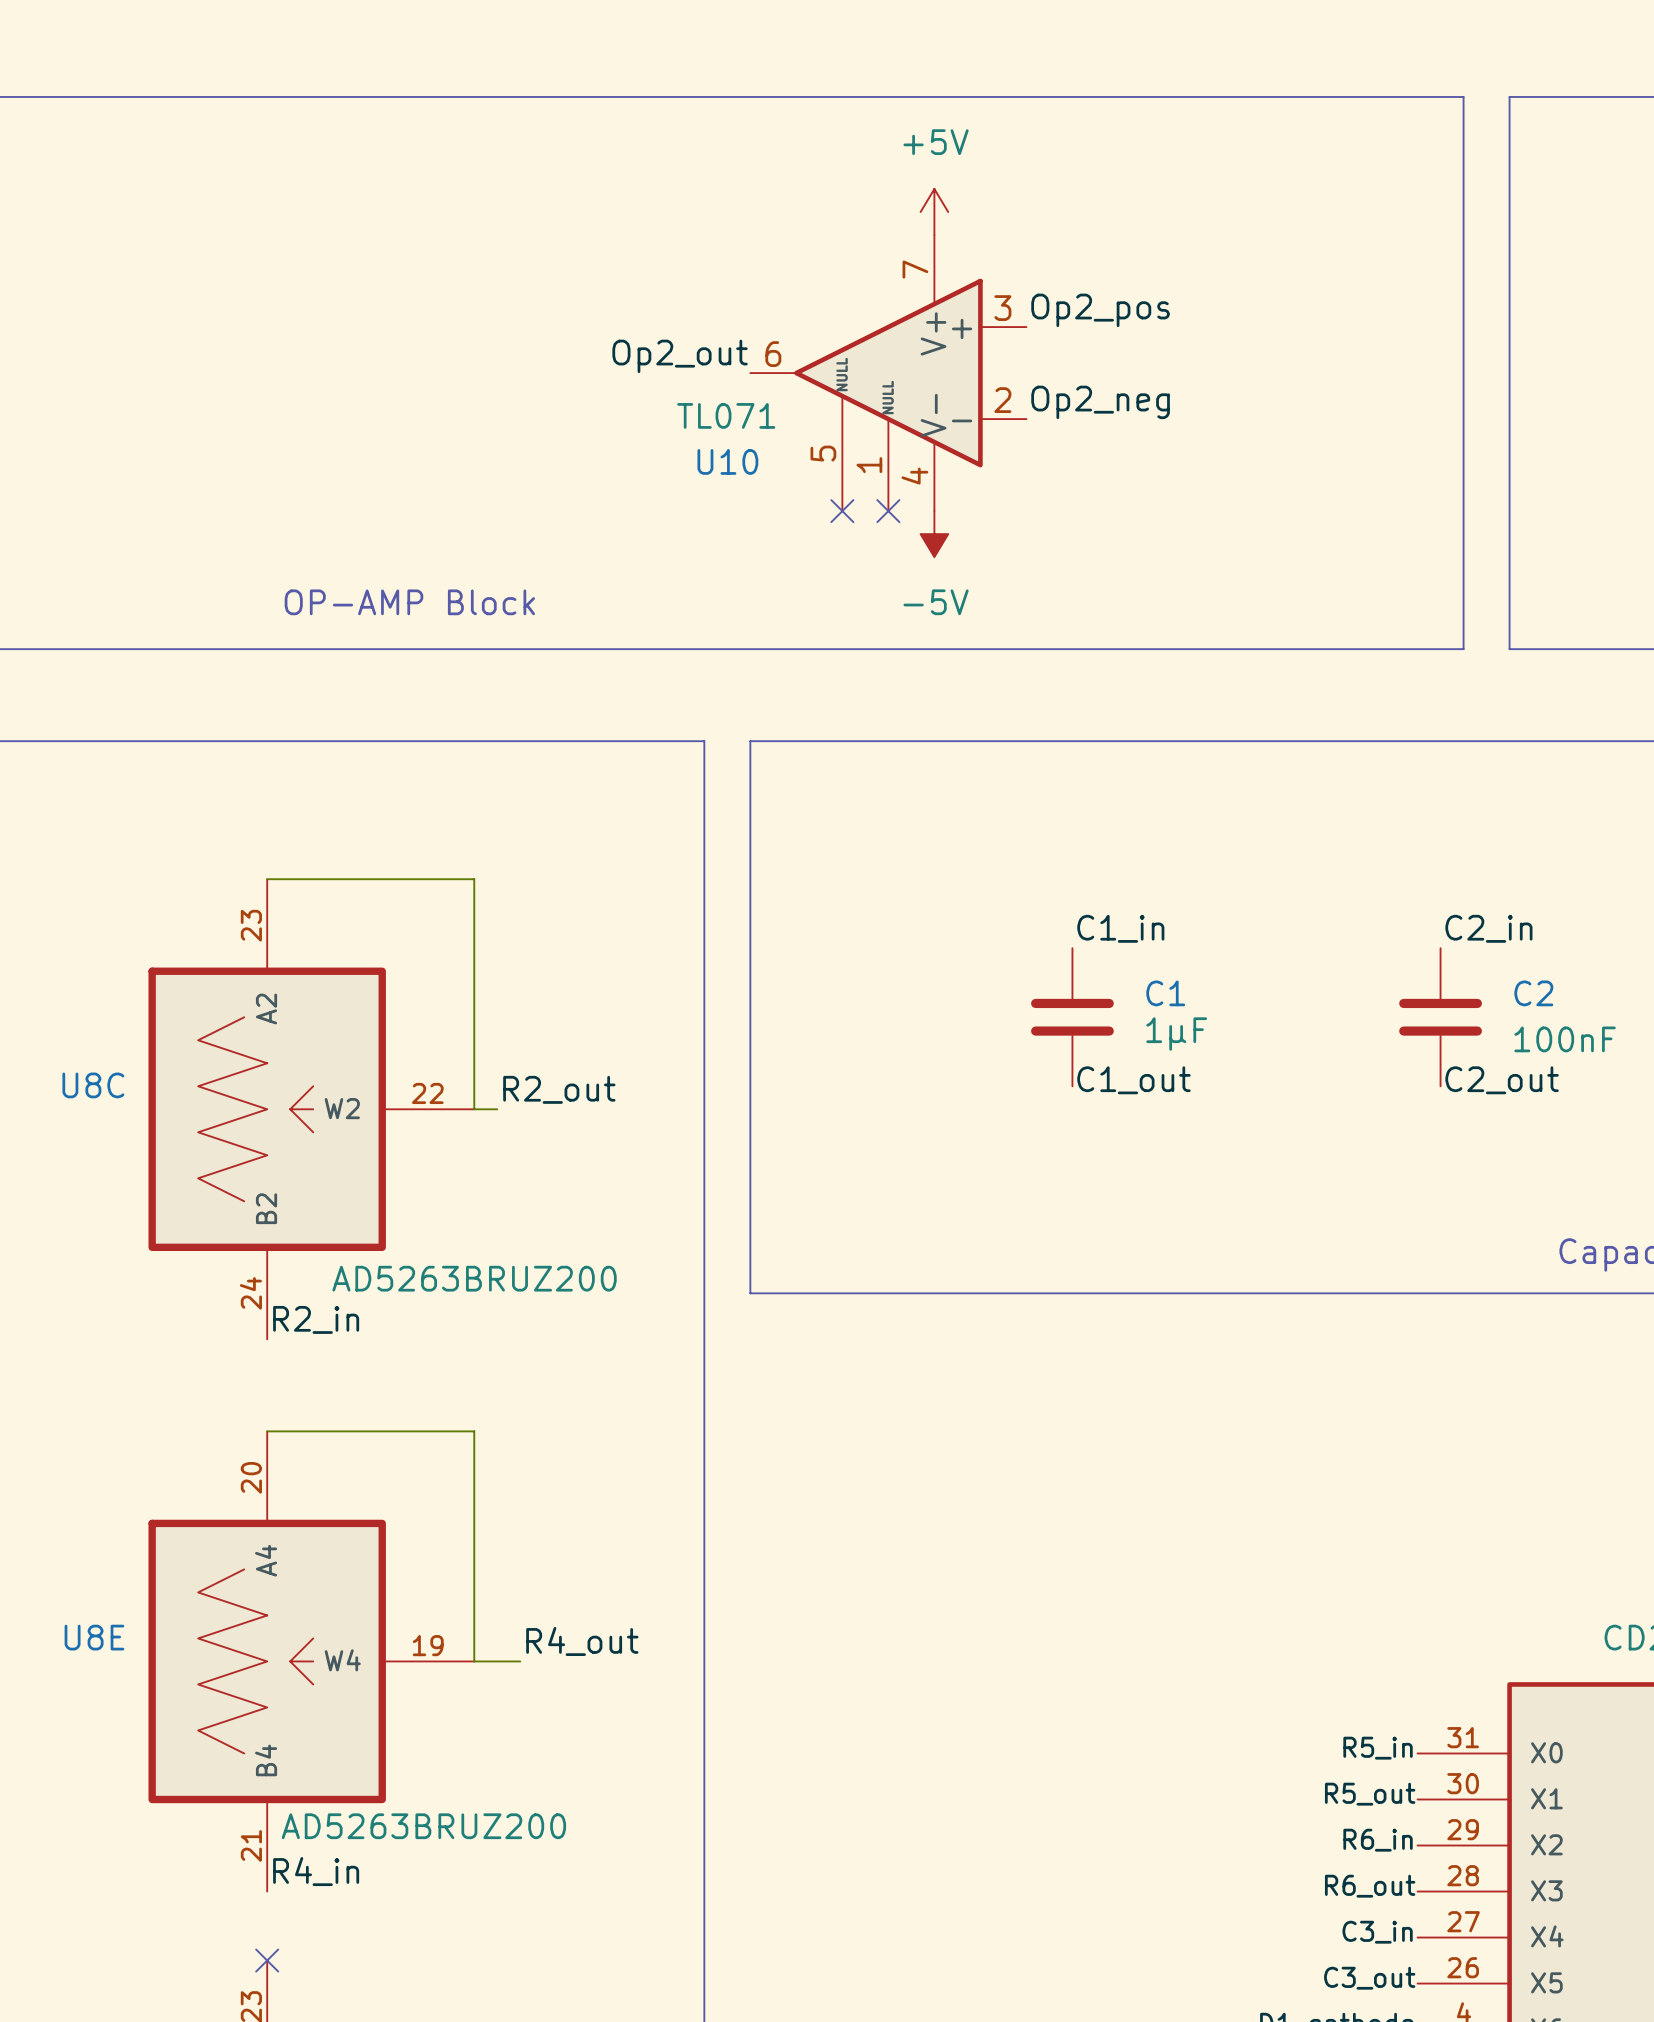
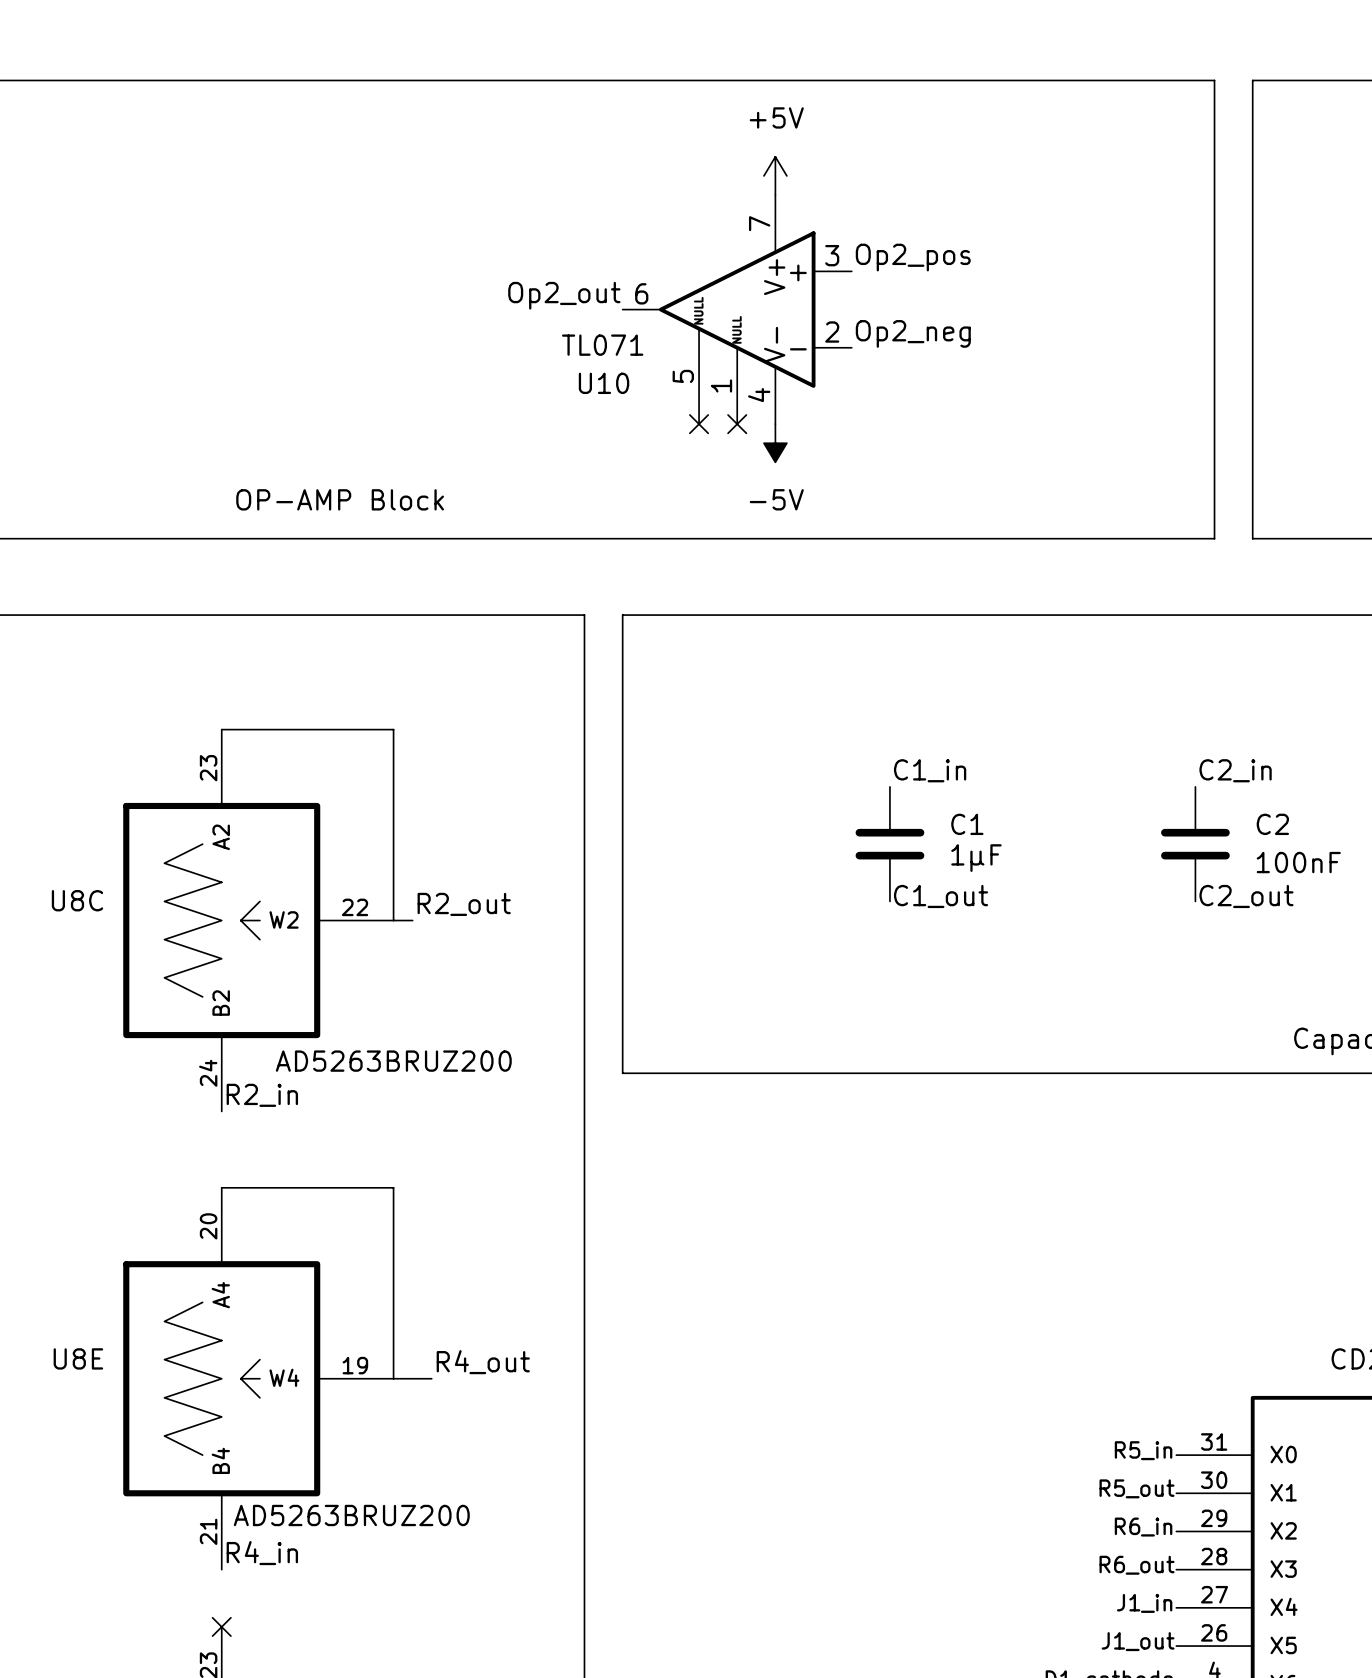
label: C3_in (1377, 1932) -> J1_in (1144, 1603)
label: C3_out (1369, 1978) -> J1_out (1138, 1641)

